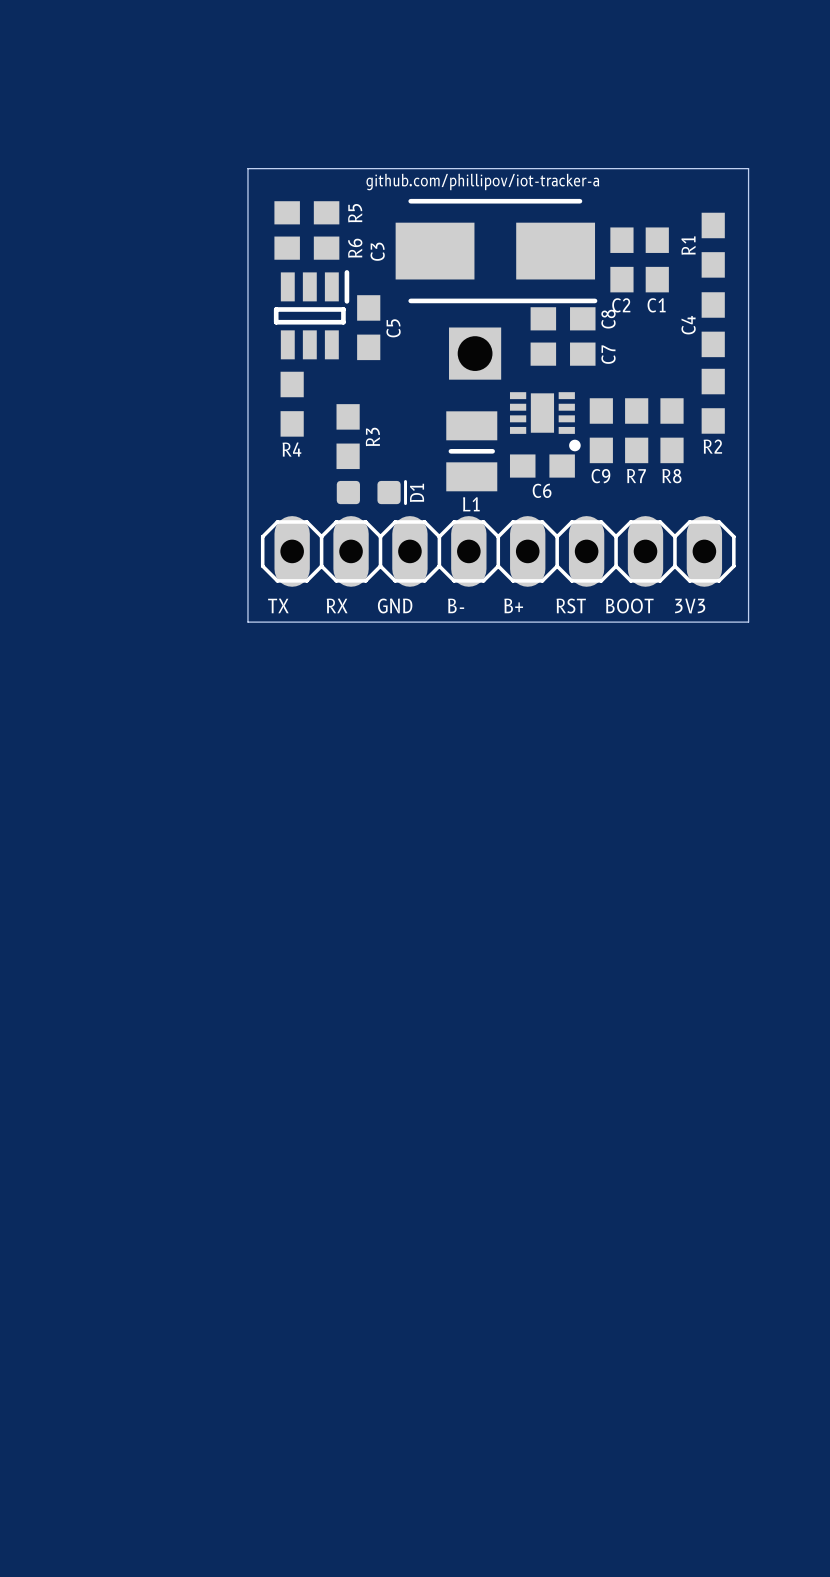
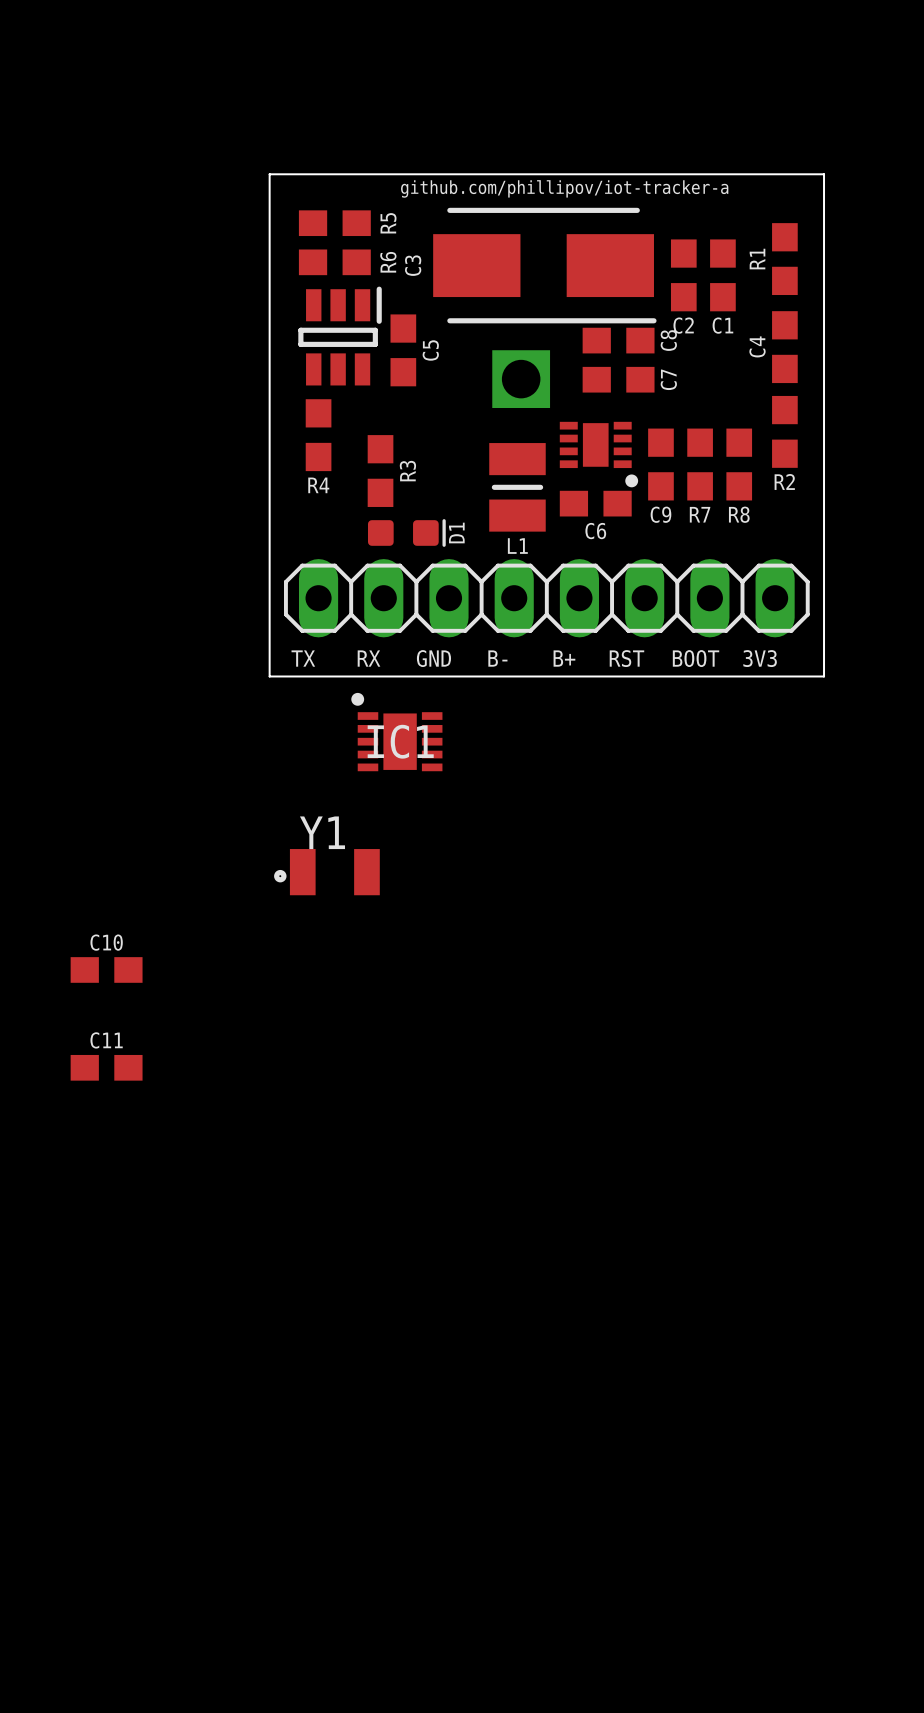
IC1: none -> (396, 732)
Y1: none -> (326, 872)
C10: none -> (106, 969)
C11: none -> (106, 1067)

